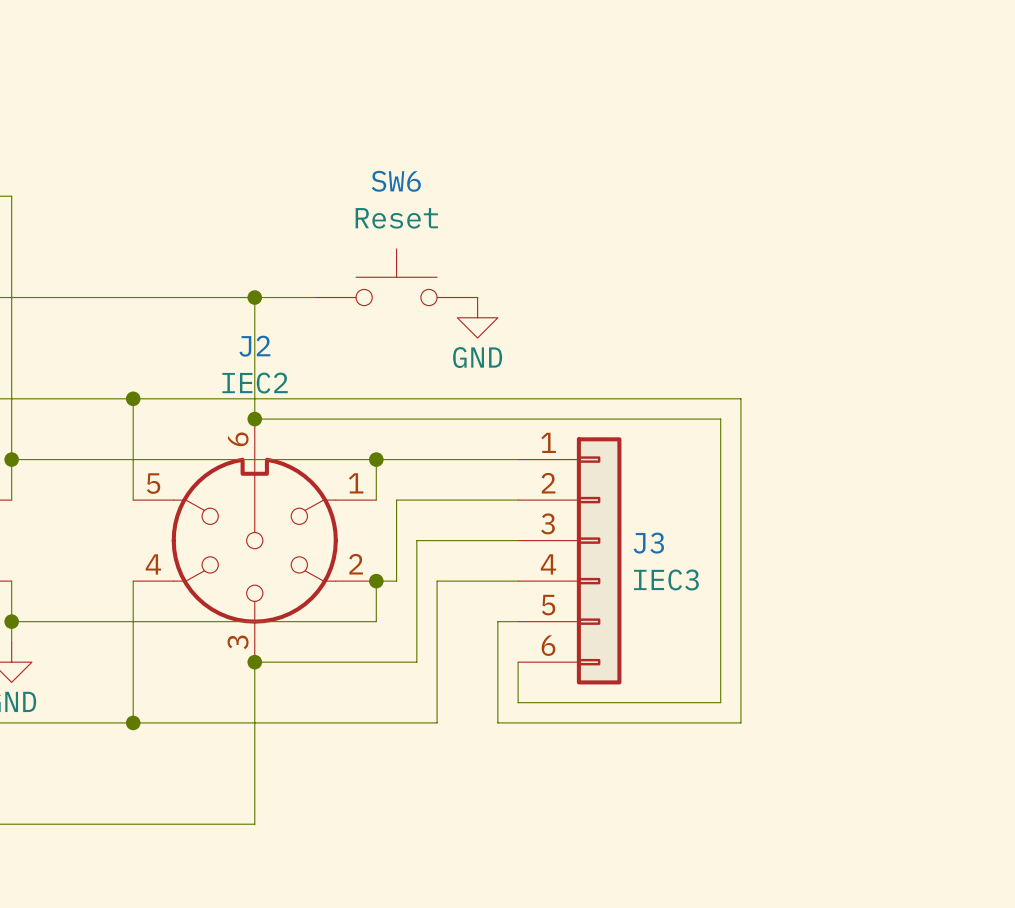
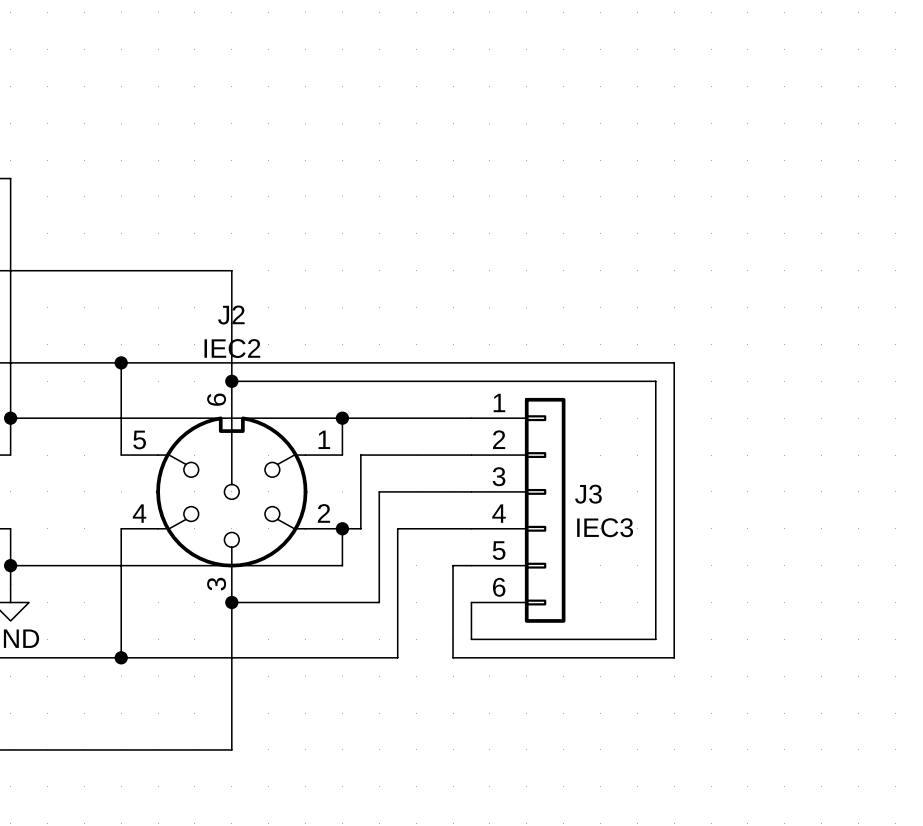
SW6: Reset (396, 277) -> none
wire: (254, 297) (315, 297) -> none
junction: (254, 297) -> none
power symbol: GND (477, 317) -> none

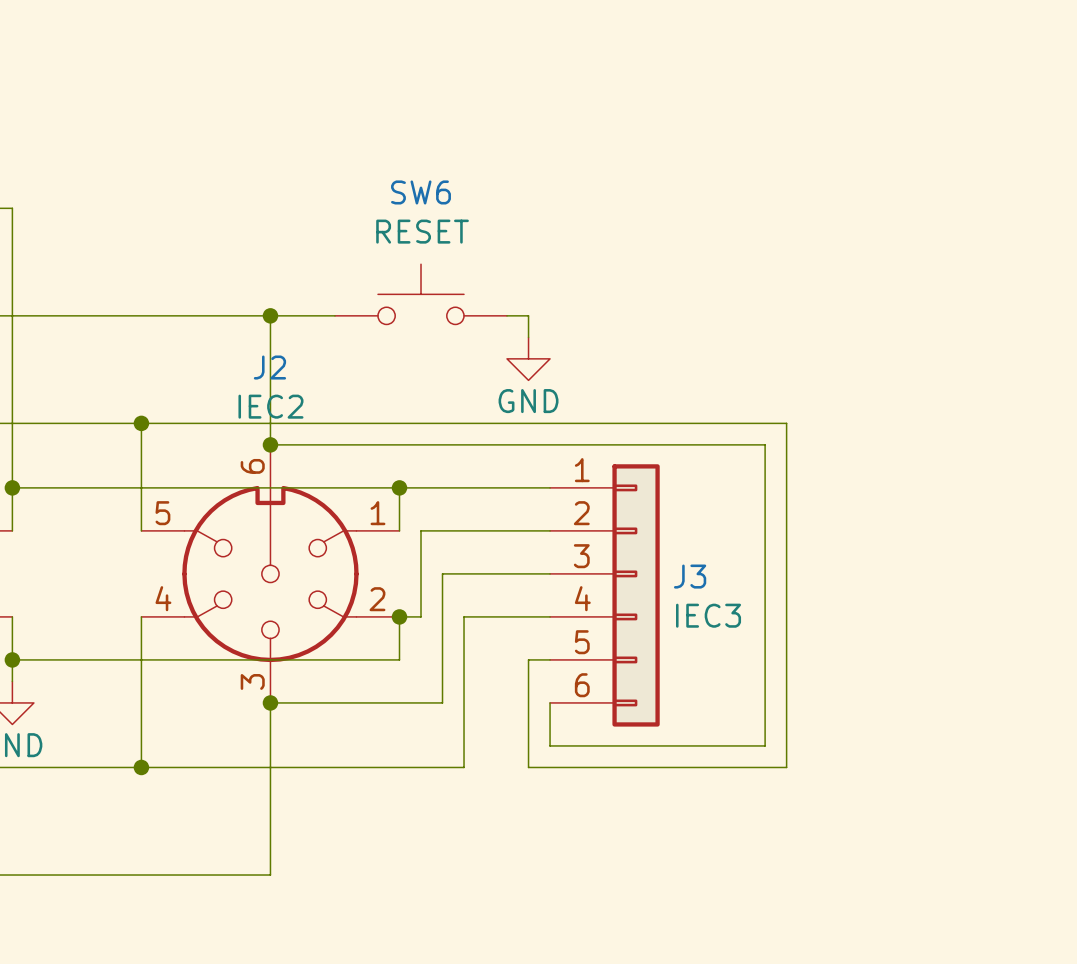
SW6: none -> RESET (421, 294)
wire: none -> (270, 315) (334, 315)
junction: none -> (270, 315)
wire: none -> (507, 315) (528, 315) (528, 337)
power symbol: none -> GND (528, 358)

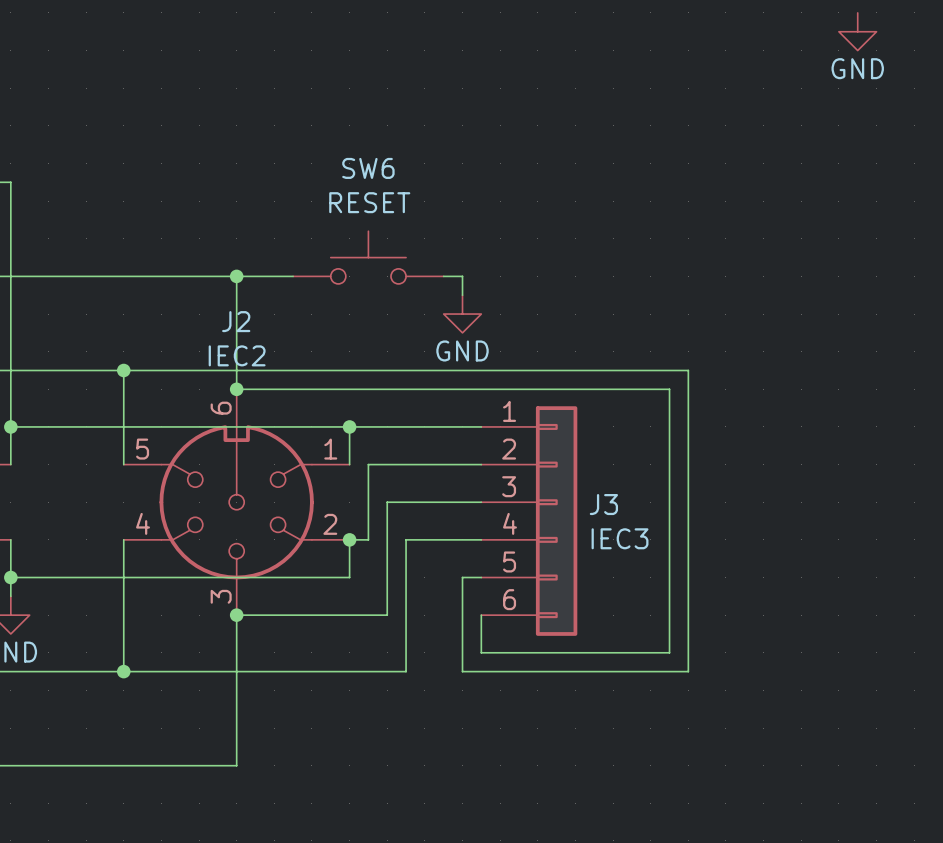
power symbol: none -> GND (857, 31)

